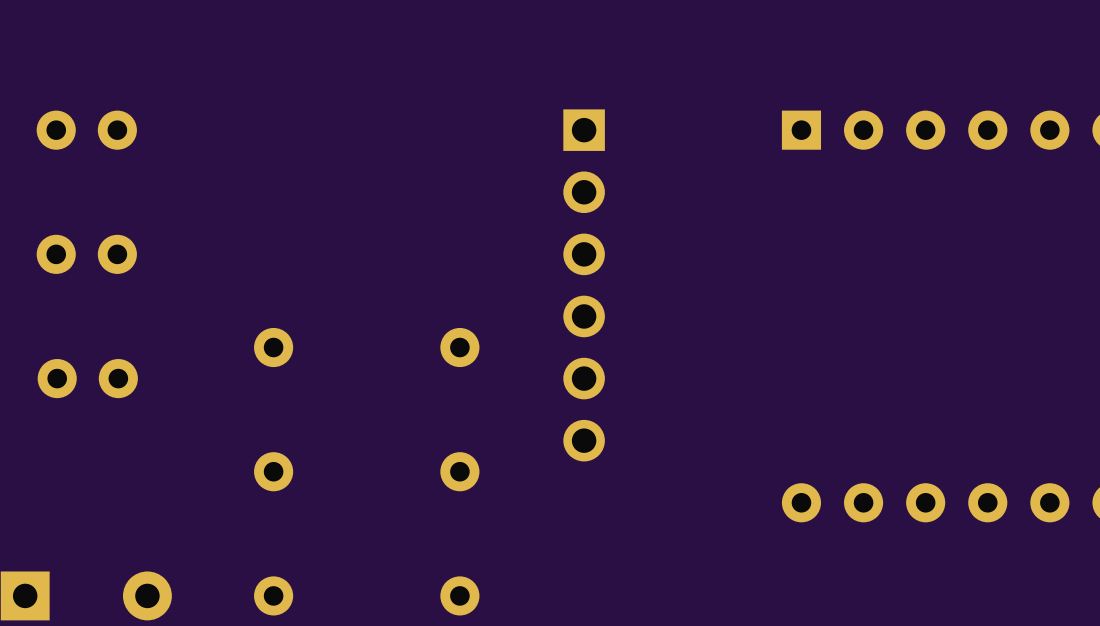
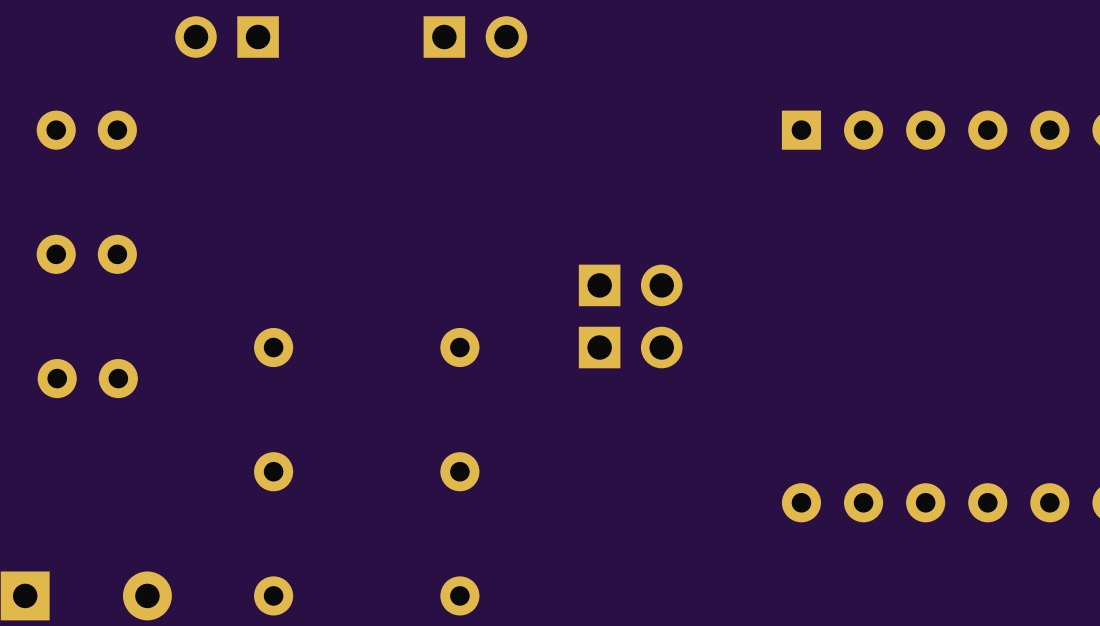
part: none -> (227, 37)
part: none -> (475, 37)
part: (584, 285) -> none
part: none -> (630, 285)
part: none -> (630, 347)

